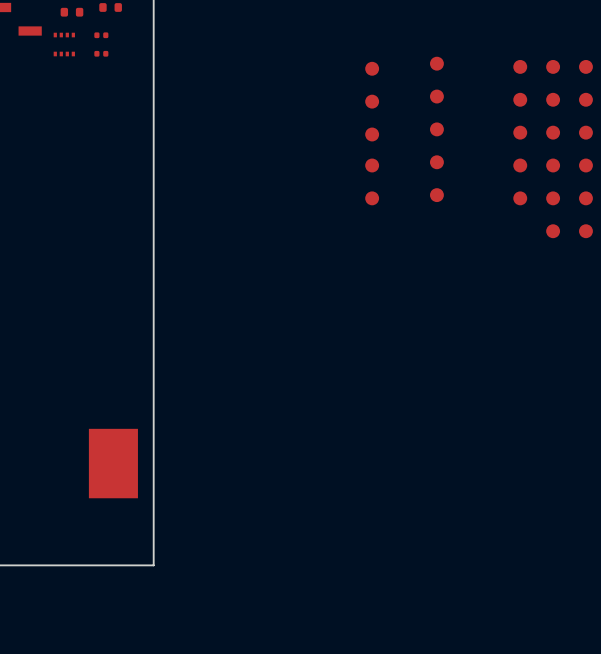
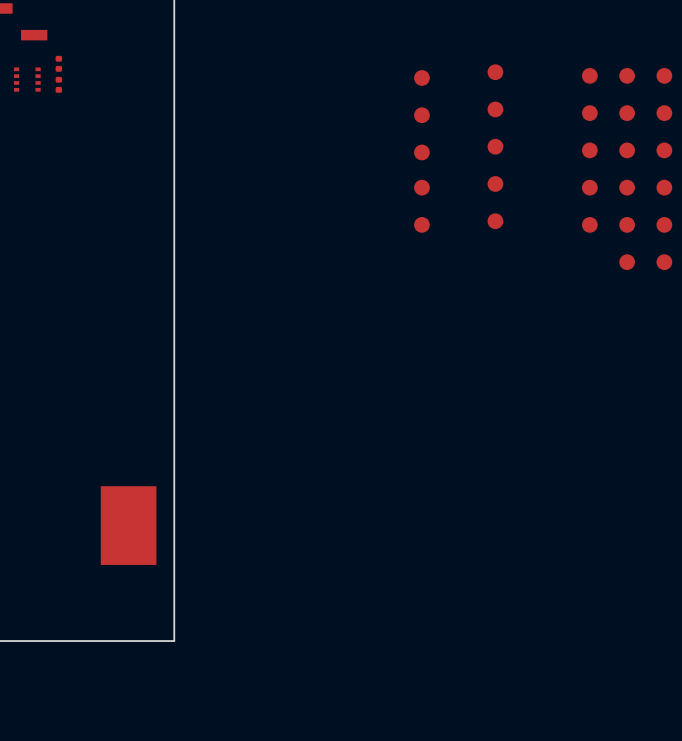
part: (110, 7) -> none
part: (71, 12) -> none
part: (101, 35) -> none
part rotation: 0° (64, 44) -> 90° clockwise (27, 79)
part position: (64, 44) -> (27, 79)
part: (101, 53) -> none
part: none -> (58, 63)
part: none -> (58, 84)

